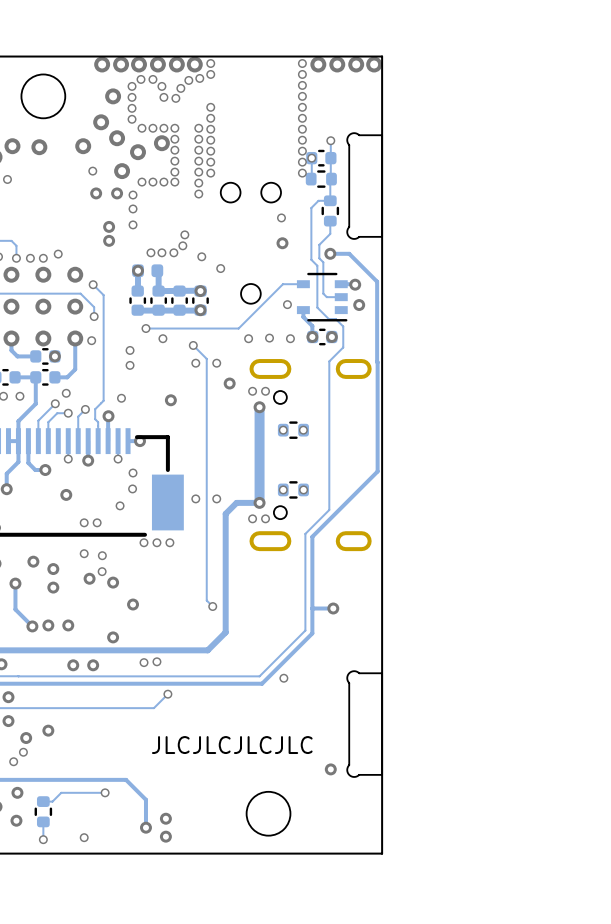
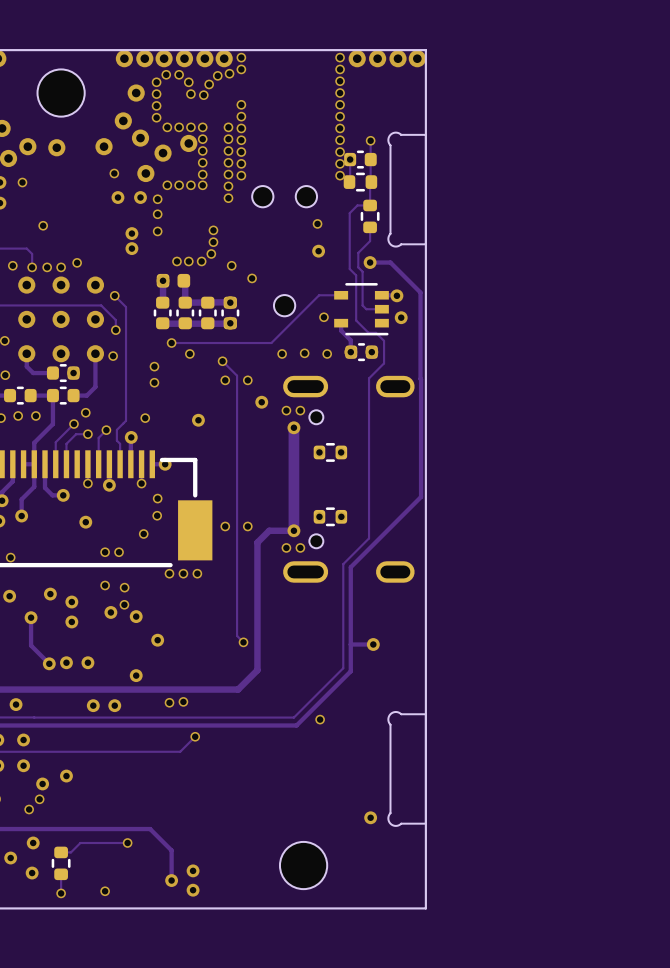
via: none -> (43, 225)
via: none -> (213, 230)
text: JLCJLCJLCJLC (232, 745) -> none

